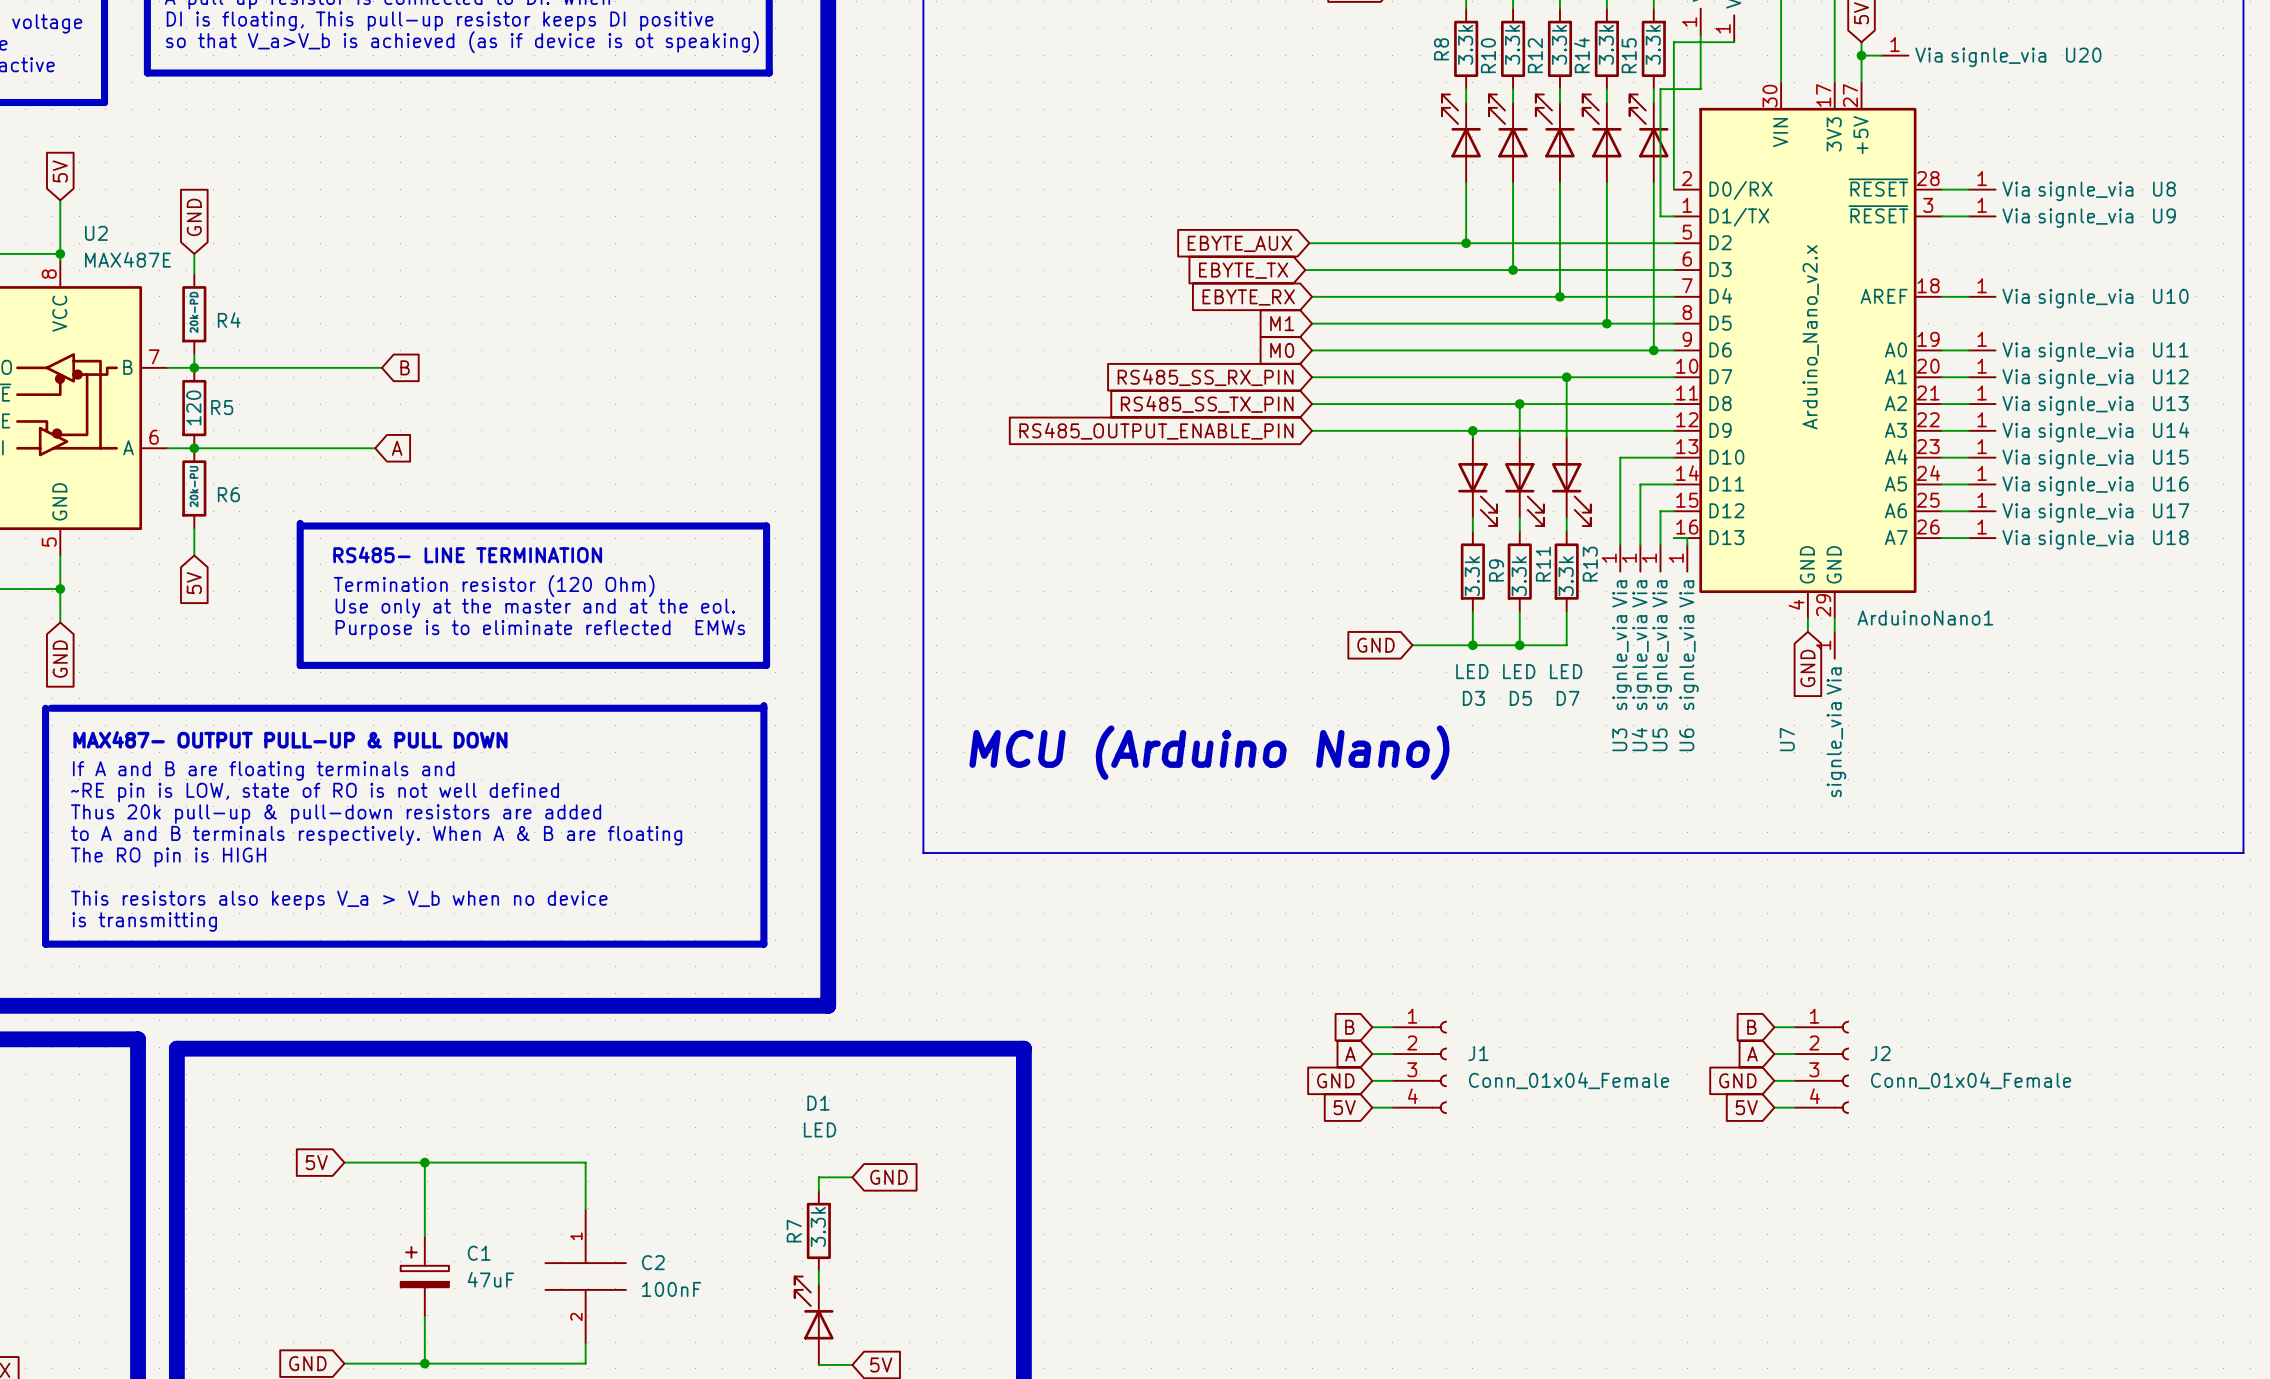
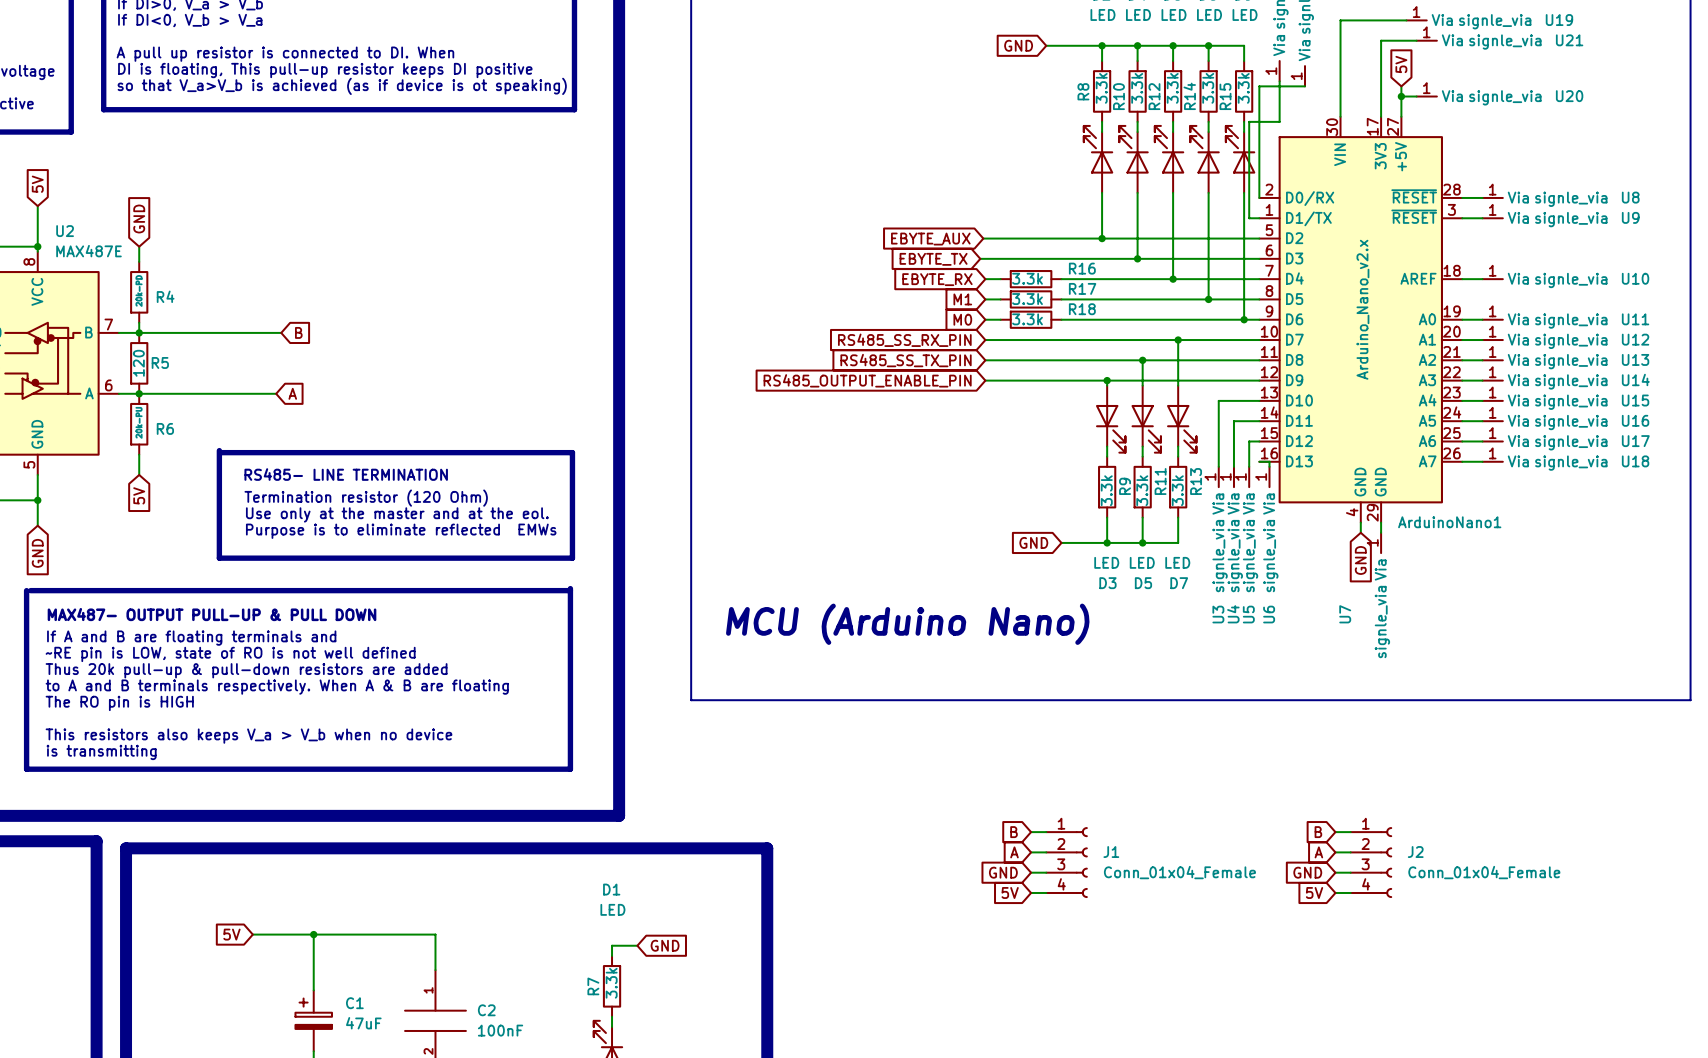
wire: (1332, 296) (1412, 296) -> none
R16: none -> 3.3k (1031, 279)
wire: (1332, 323) (1412, 323) -> none
R17: none -> 3.3k (1031, 299)
wire: (1332, 350) (1412, 350) -> none
R18: none -> 3.3k (1031, 319)

